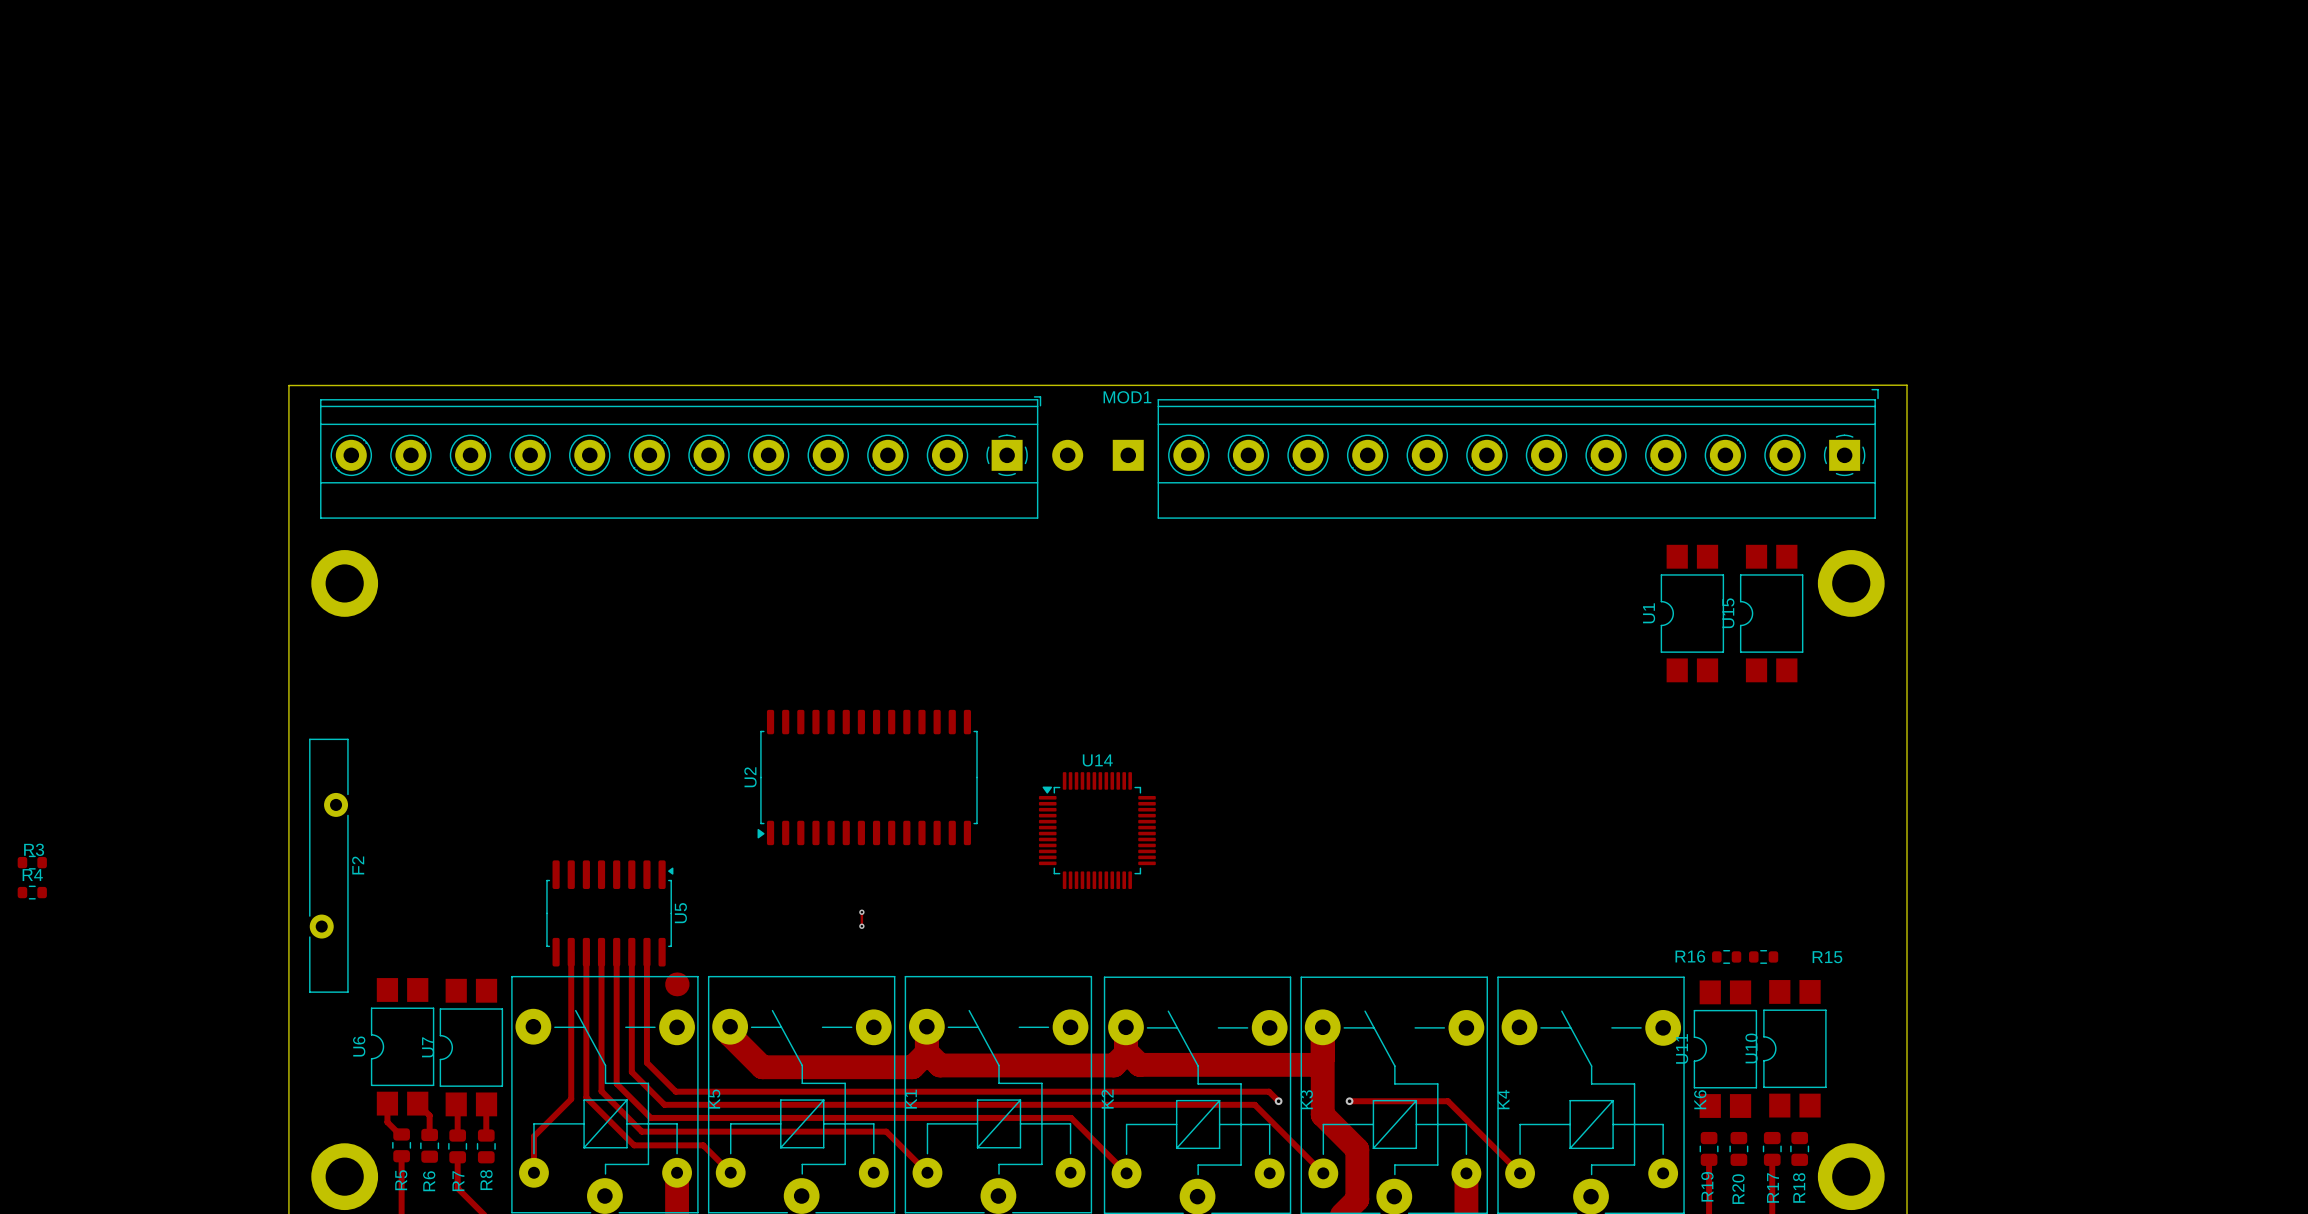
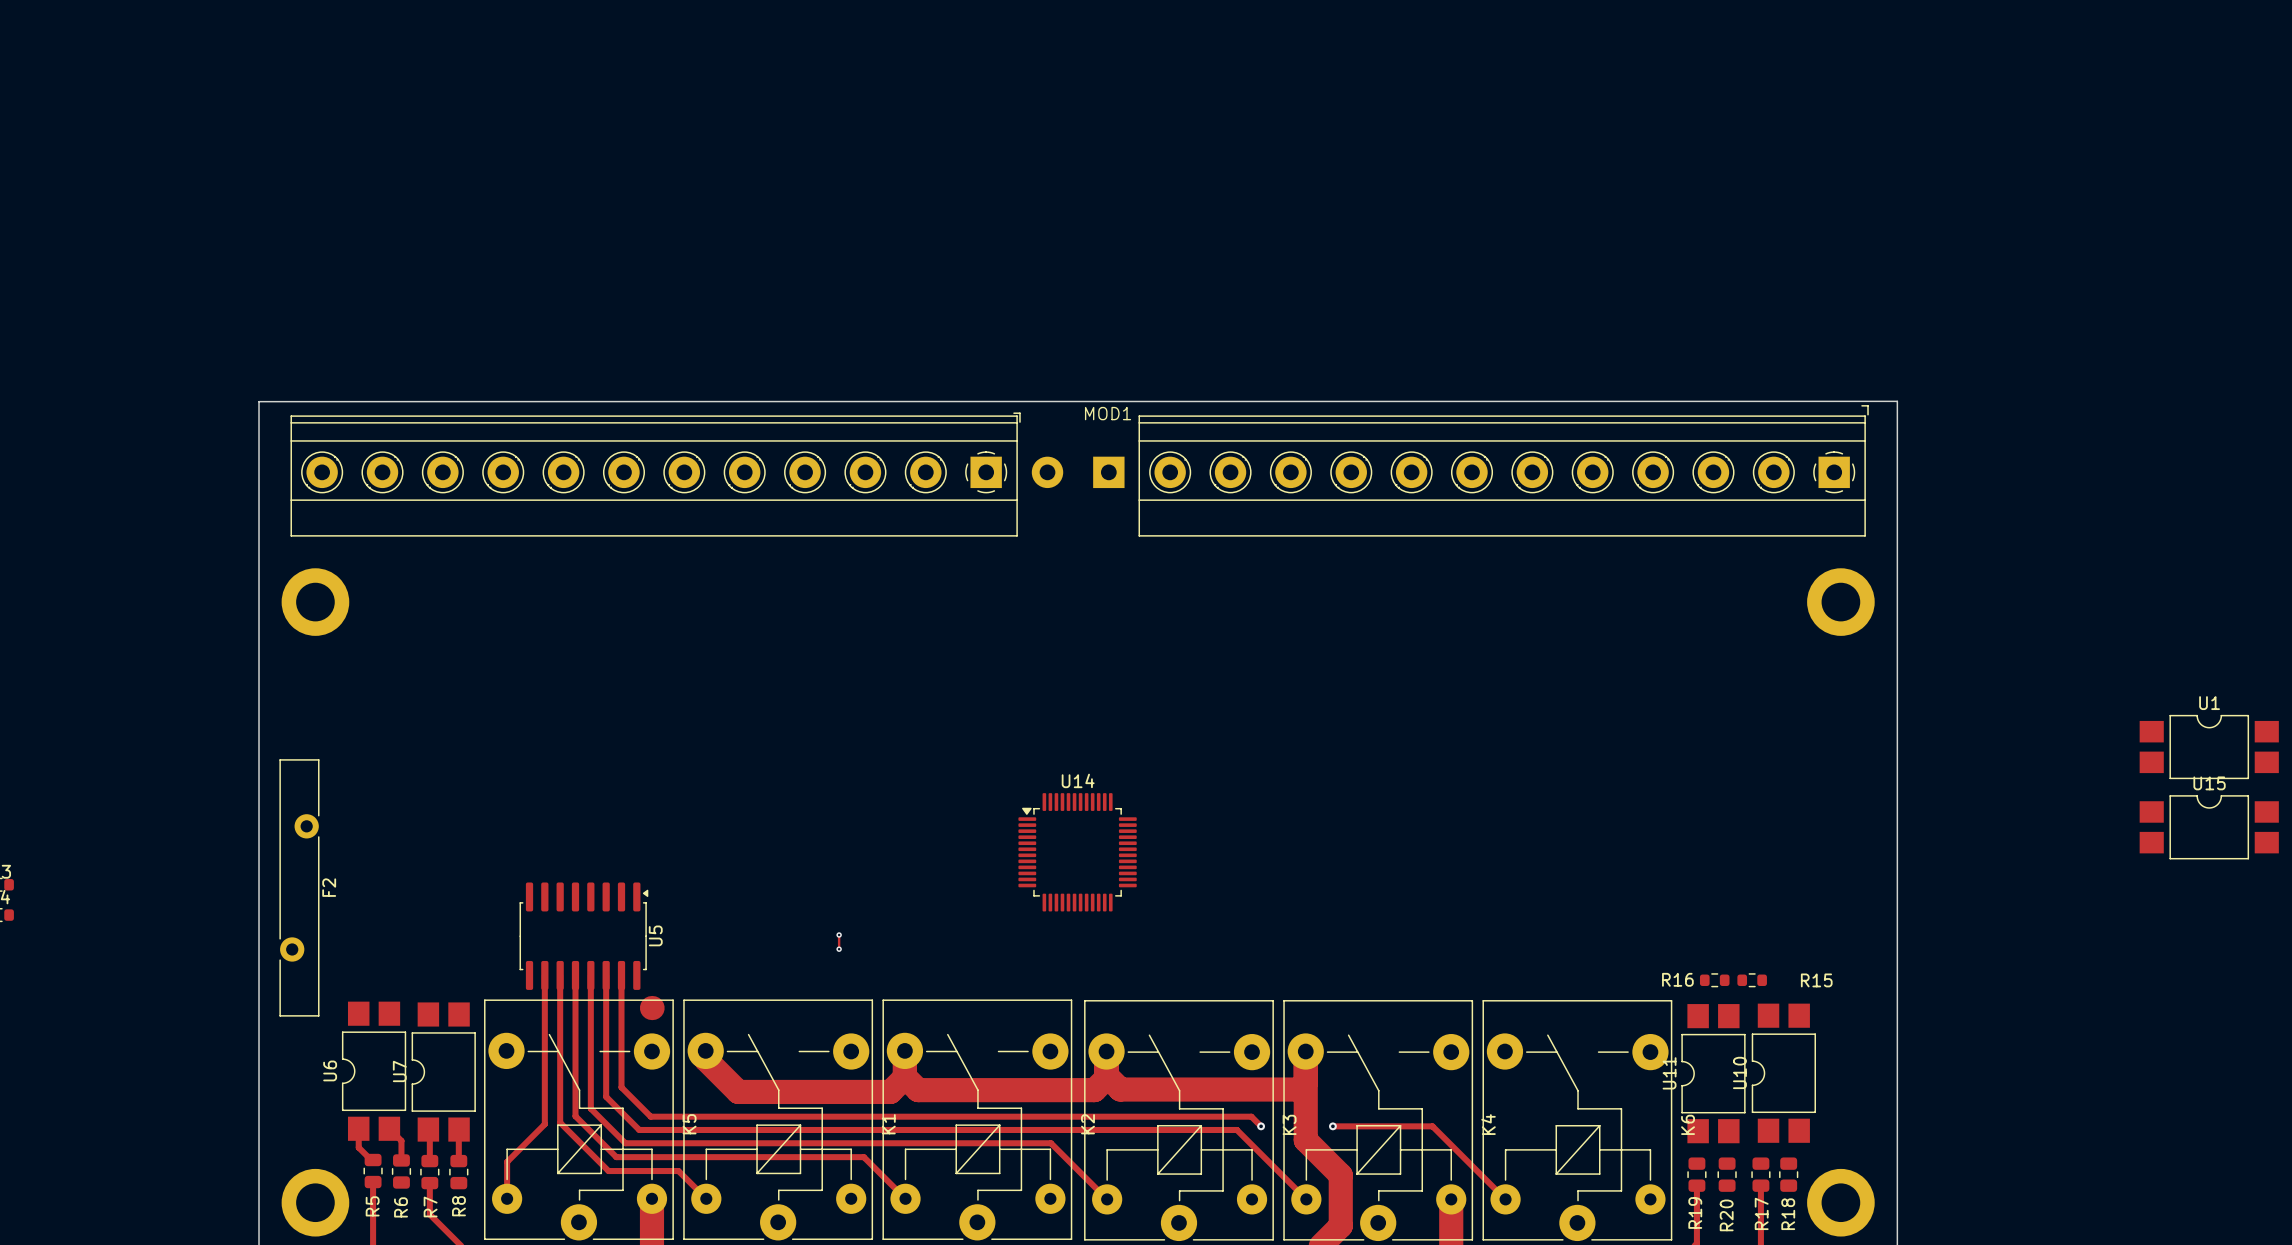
U1 rotation: 0° (1692, 613) -> 90° clockwise (2209, 747)
U1 position: (1692, 613) -> (2209, 747)
U15 rotation: 0° (1771, 613) -> 90° clockwise (2209, 827)
U15 position: (1771, 613) -> (2209, 827)
U2: (867, 777) -> none

